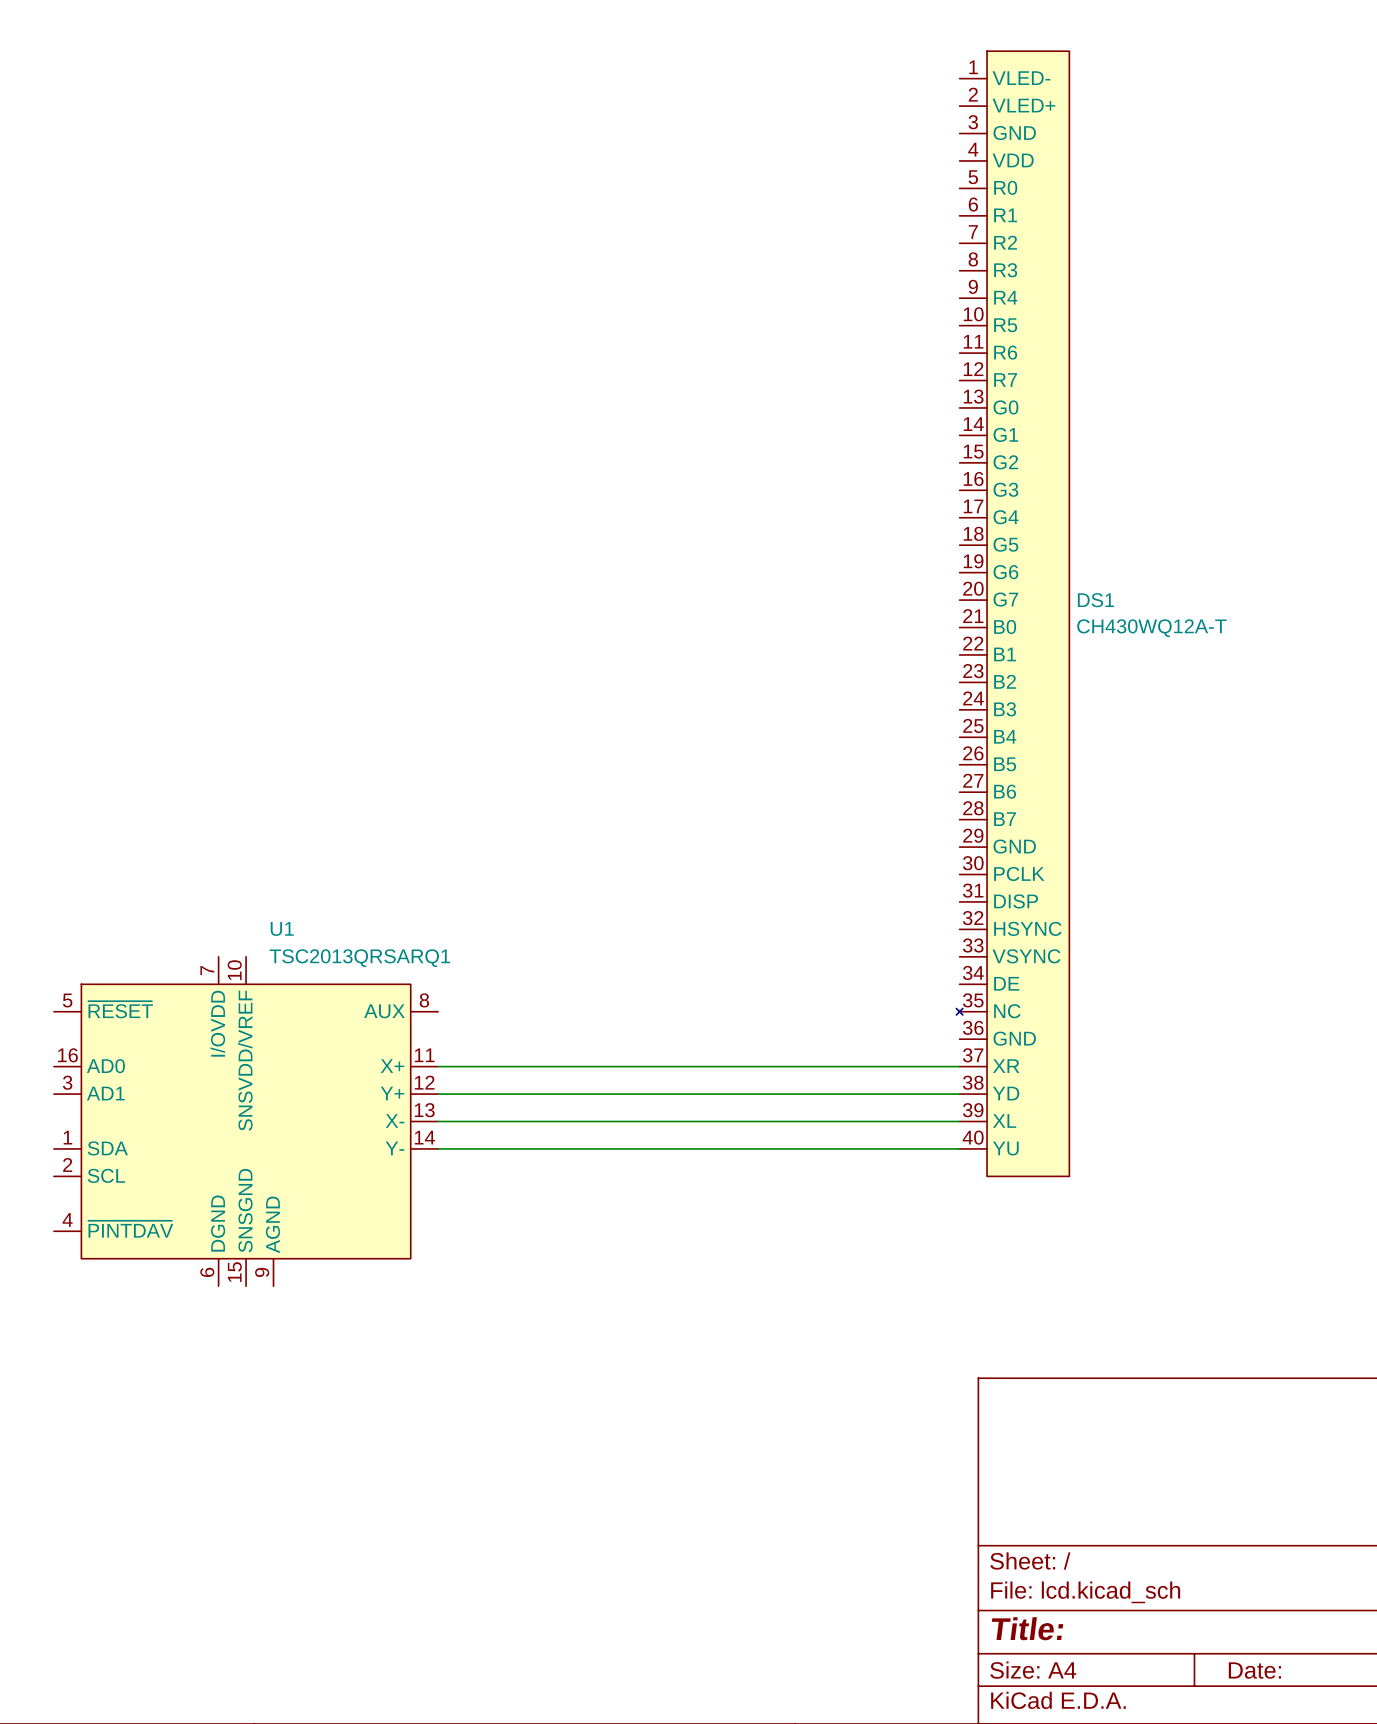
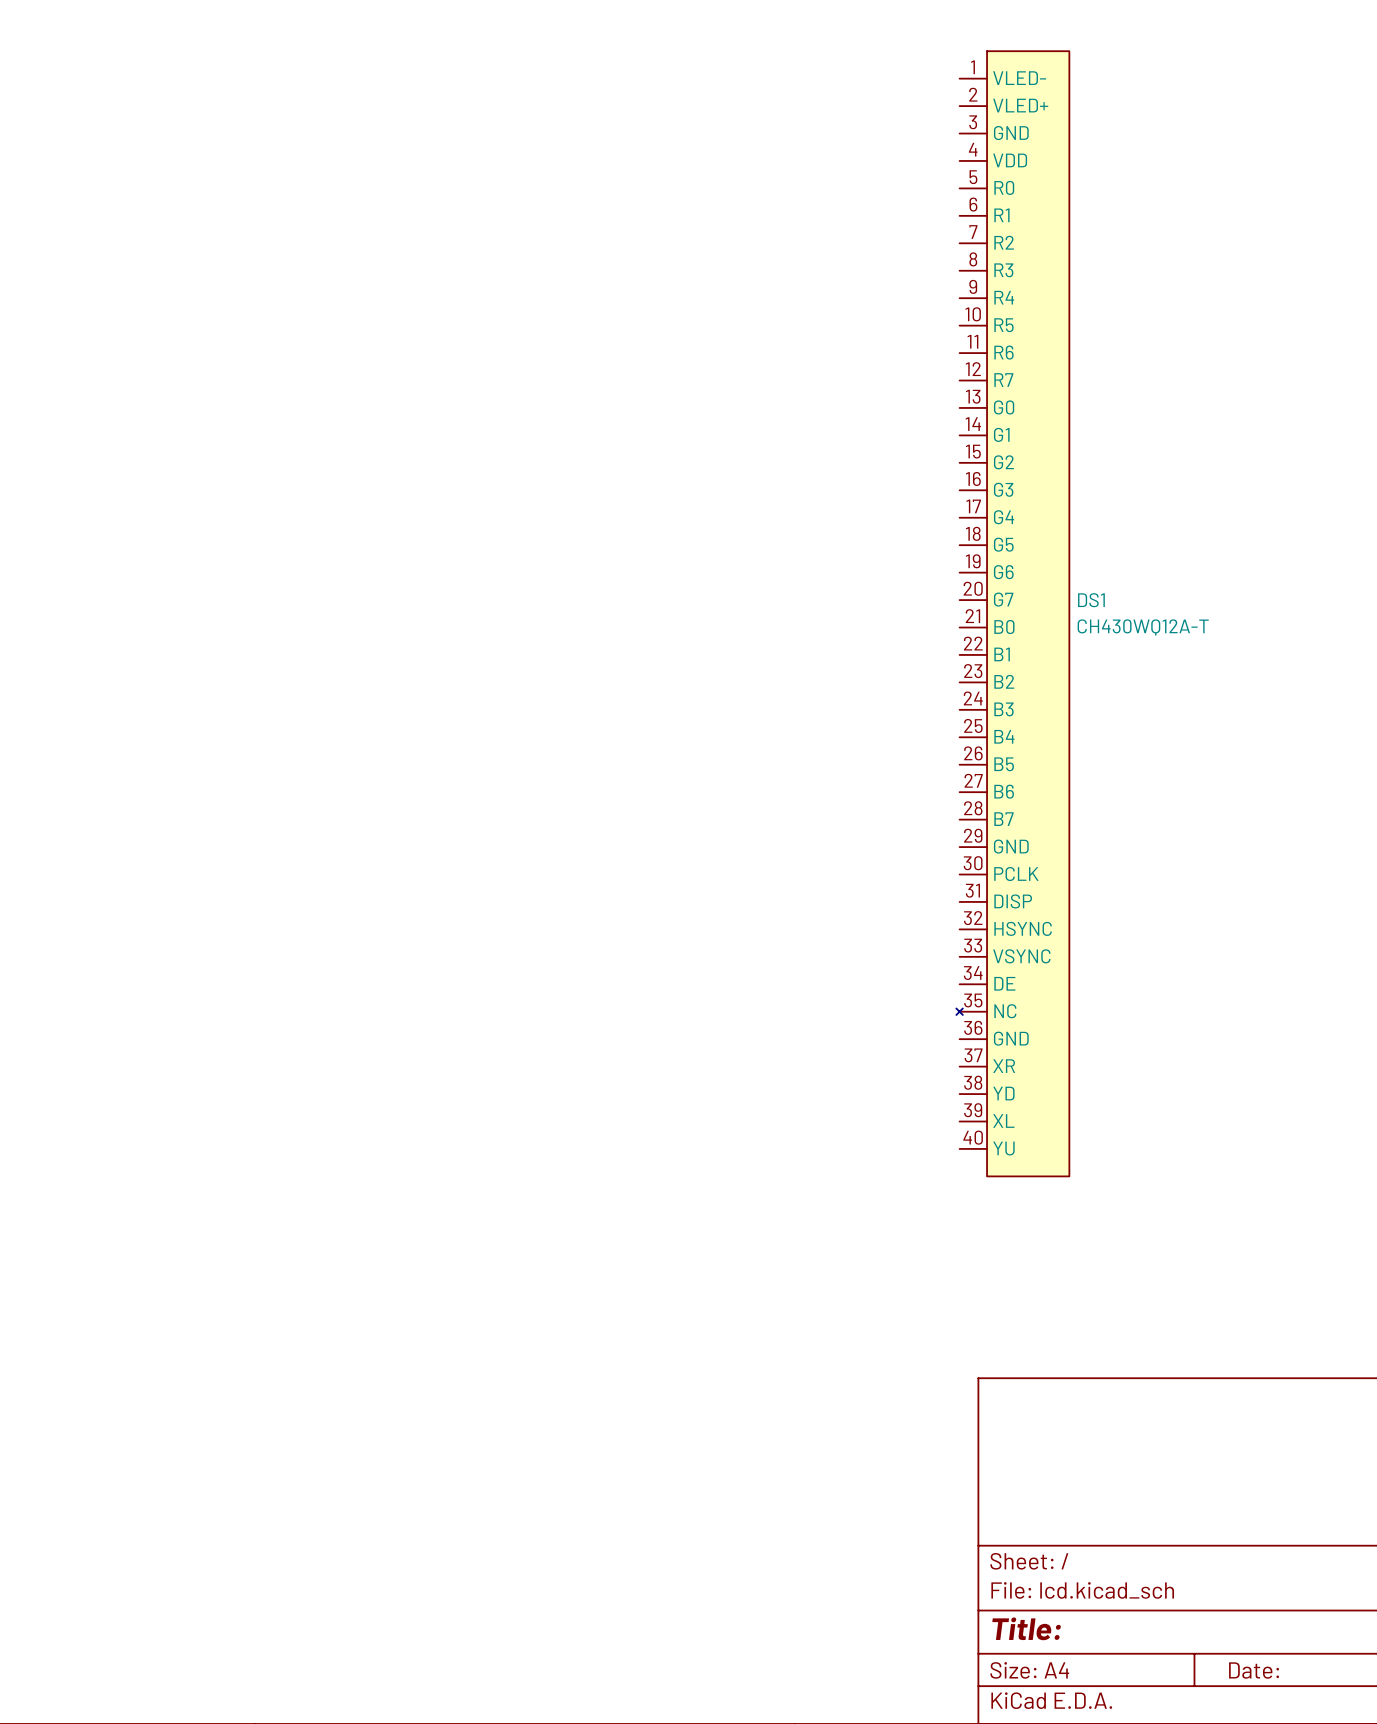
wire: (438, 1066) (959, 1066) -> none
wire: (438, 1094) (959, 1094) -> none
U1: TSC2013QRSARQ1 (246, 1121) -> none
wire: (438, 1121) (959, 1121) -> none
wire: (438, 1148) (959, 1148) -> none

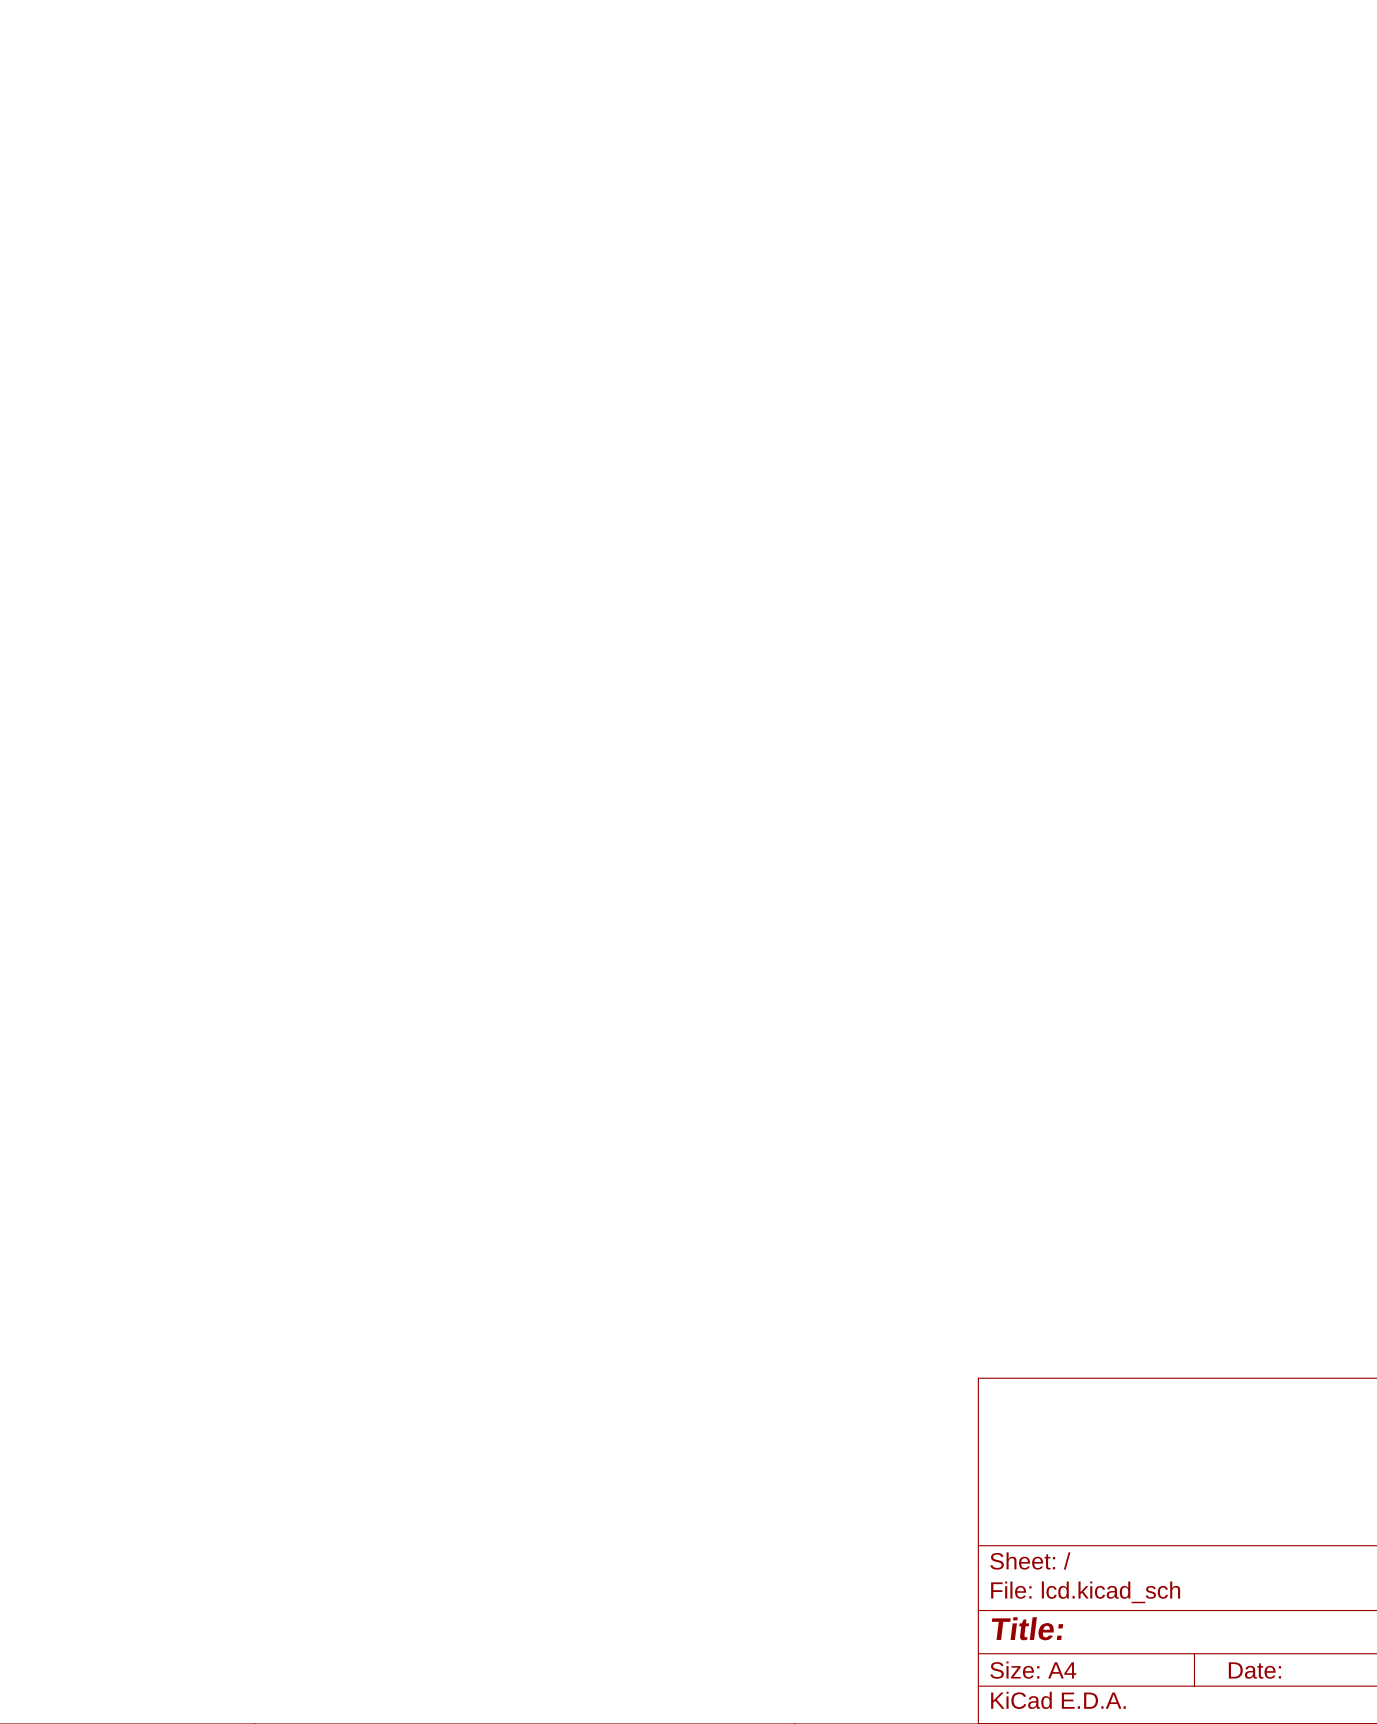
DS1: CH430WQ12A-T (1012, 613) -> none

